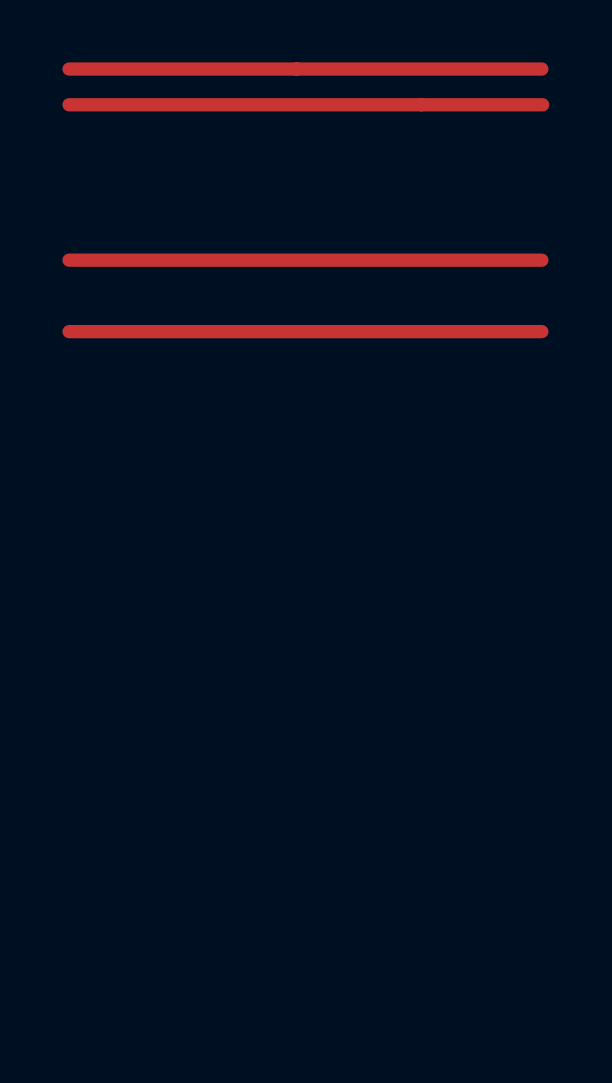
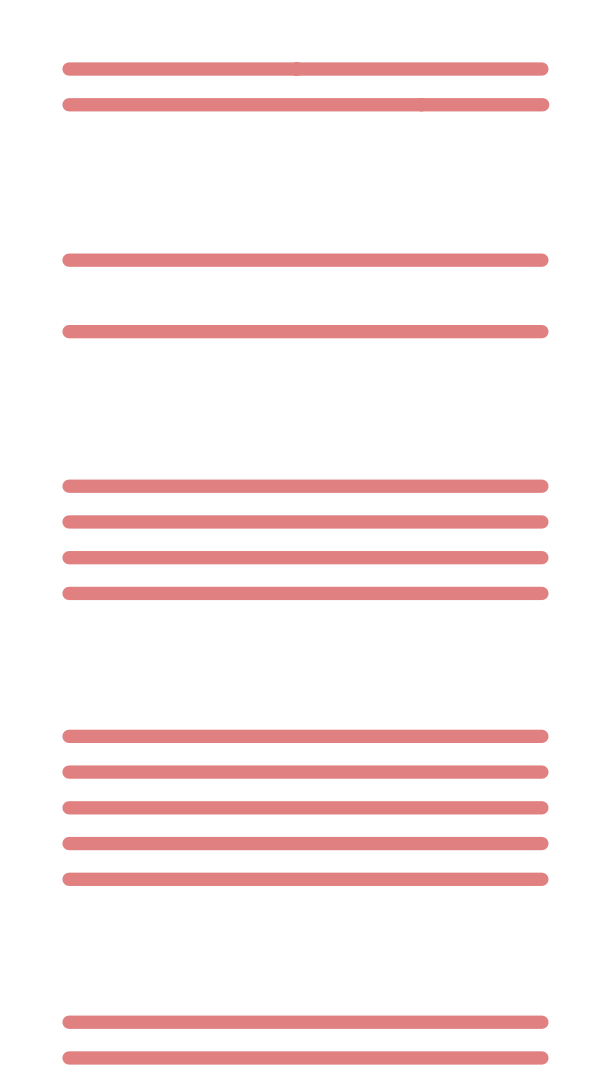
track: none -> (69, 486) (541, 486)
track: none -> (69, 521) (541, 521)
track: none -> (69, 557) (541, 557)
track: none -> (69, 593) (541, 593)
track: none -> (69, 736) (541, 736)
track: none -> (69, 772) (541, 772)
track: none -> (69, 807) (541, 807)
track: none -> (69, 843) (541, 843)
track: none -> (69, 879) (541, 879)
track: none -> (69, 1022) (541, 1022)
track: none -> (69, 1057) (541, 1057)

